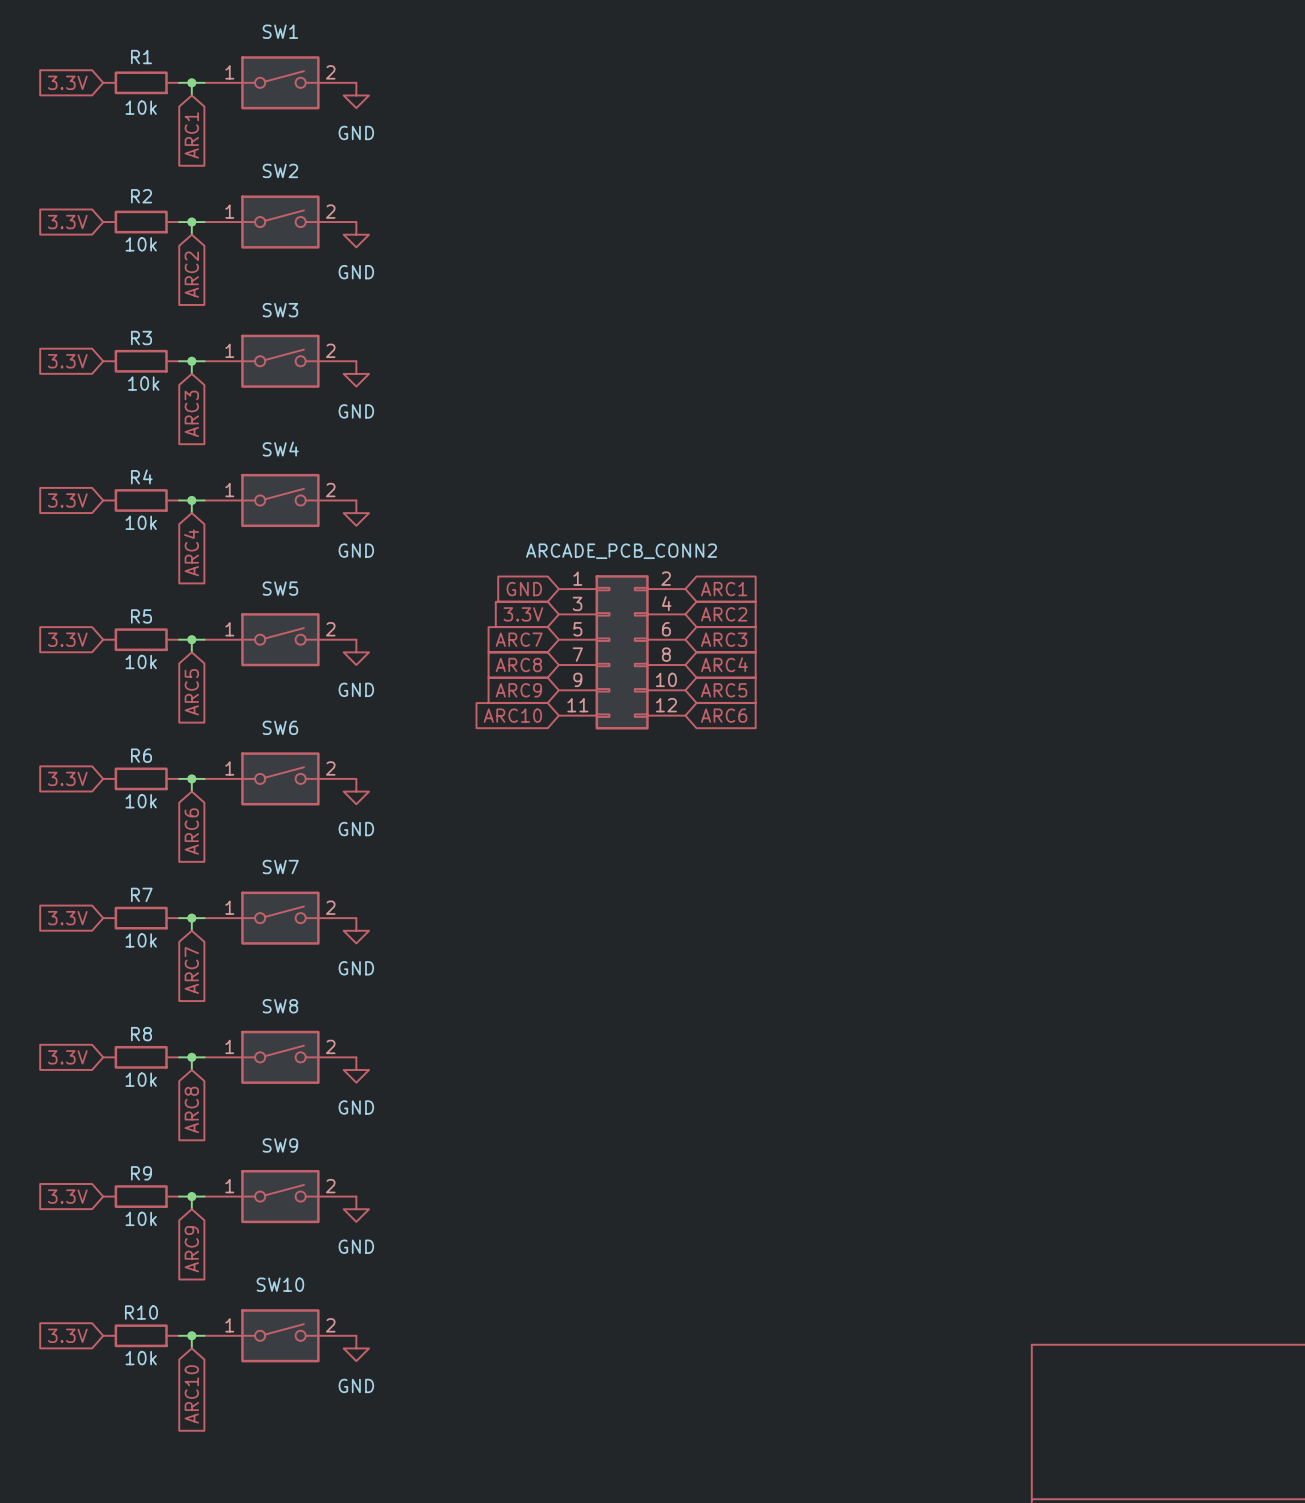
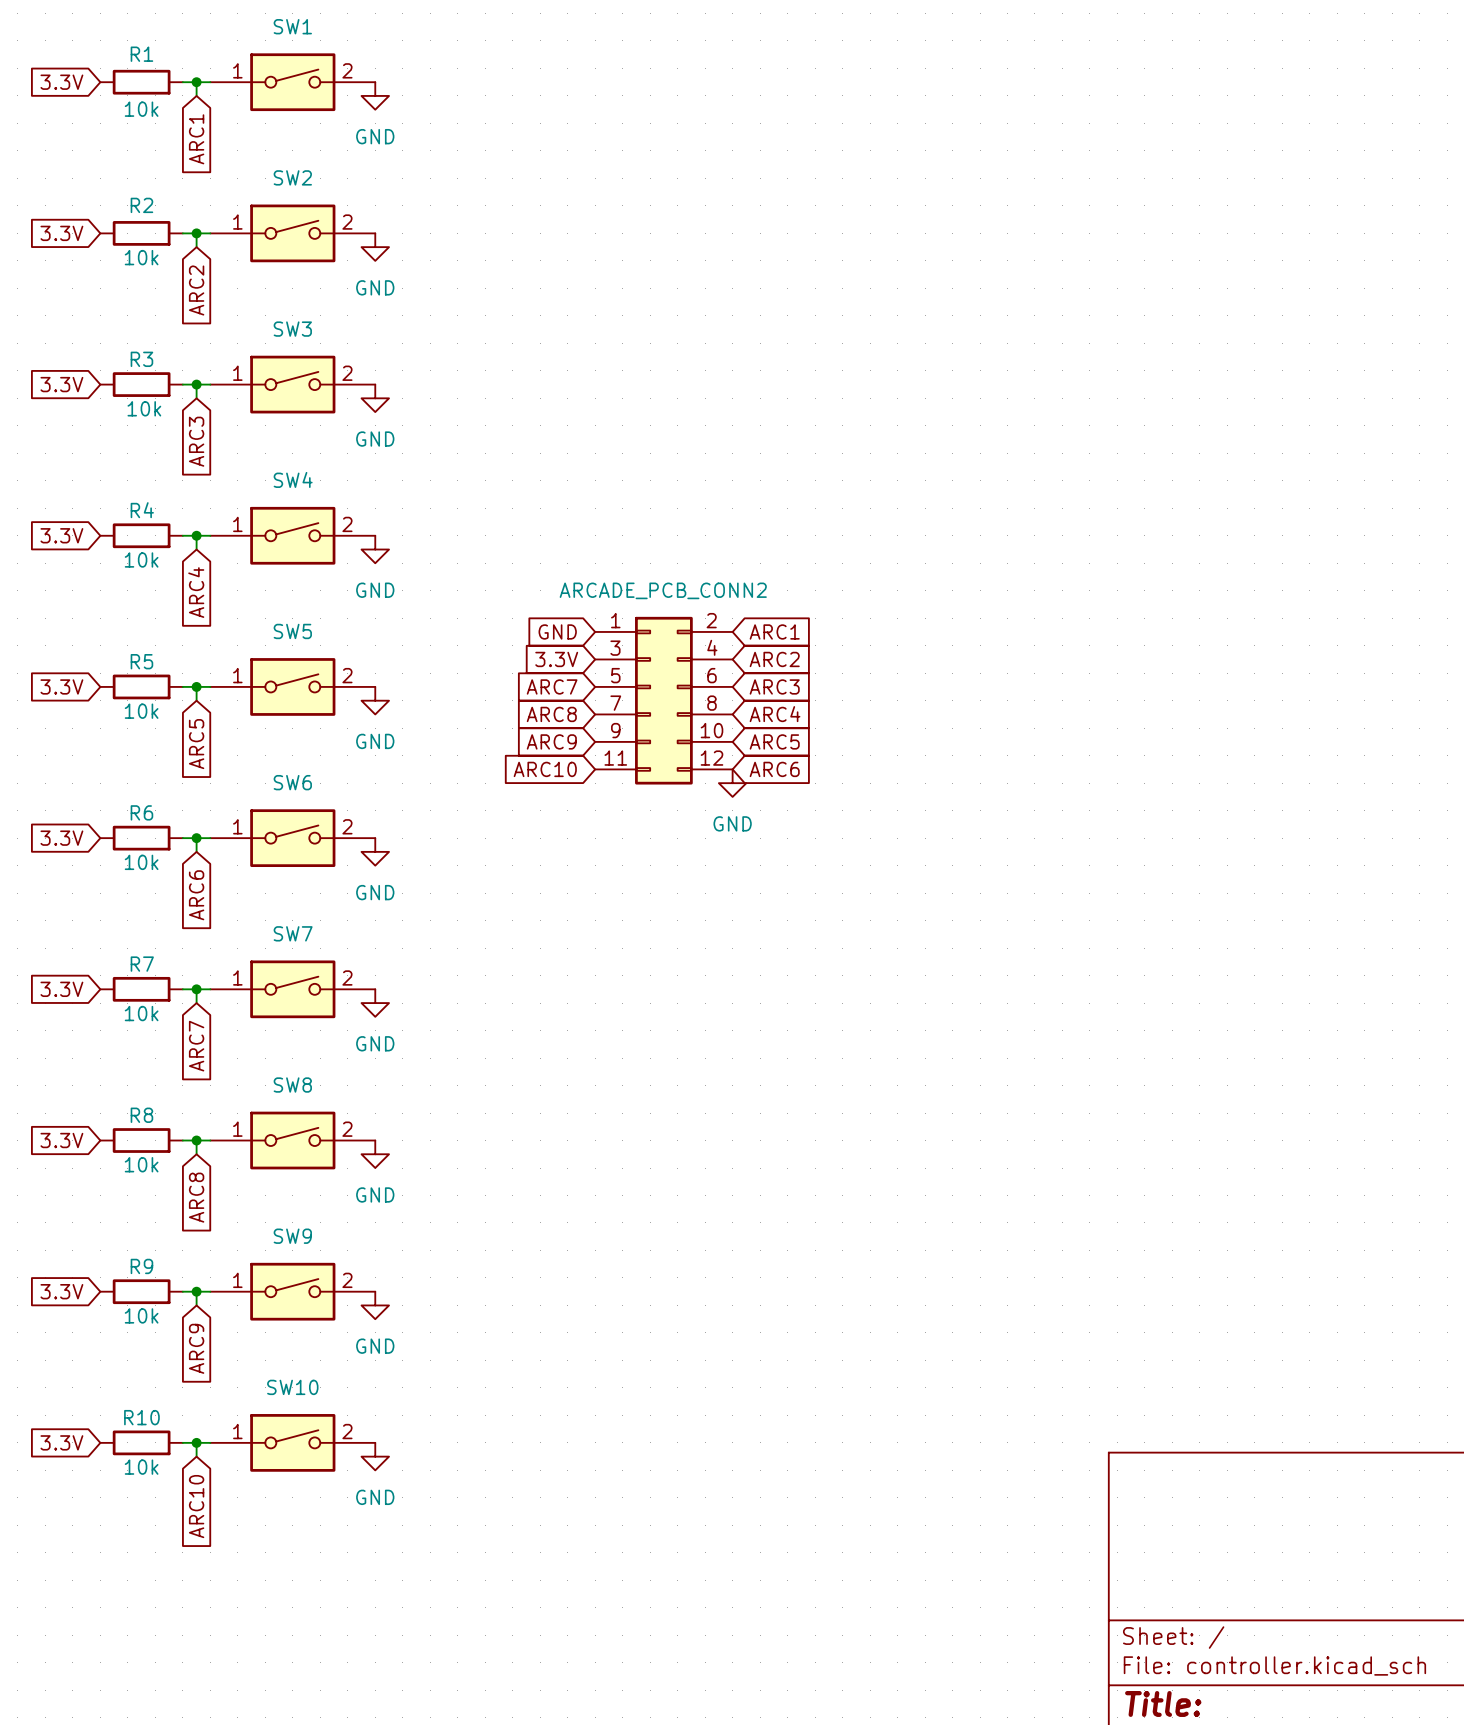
power symbol: none -> GND (732, 783)

